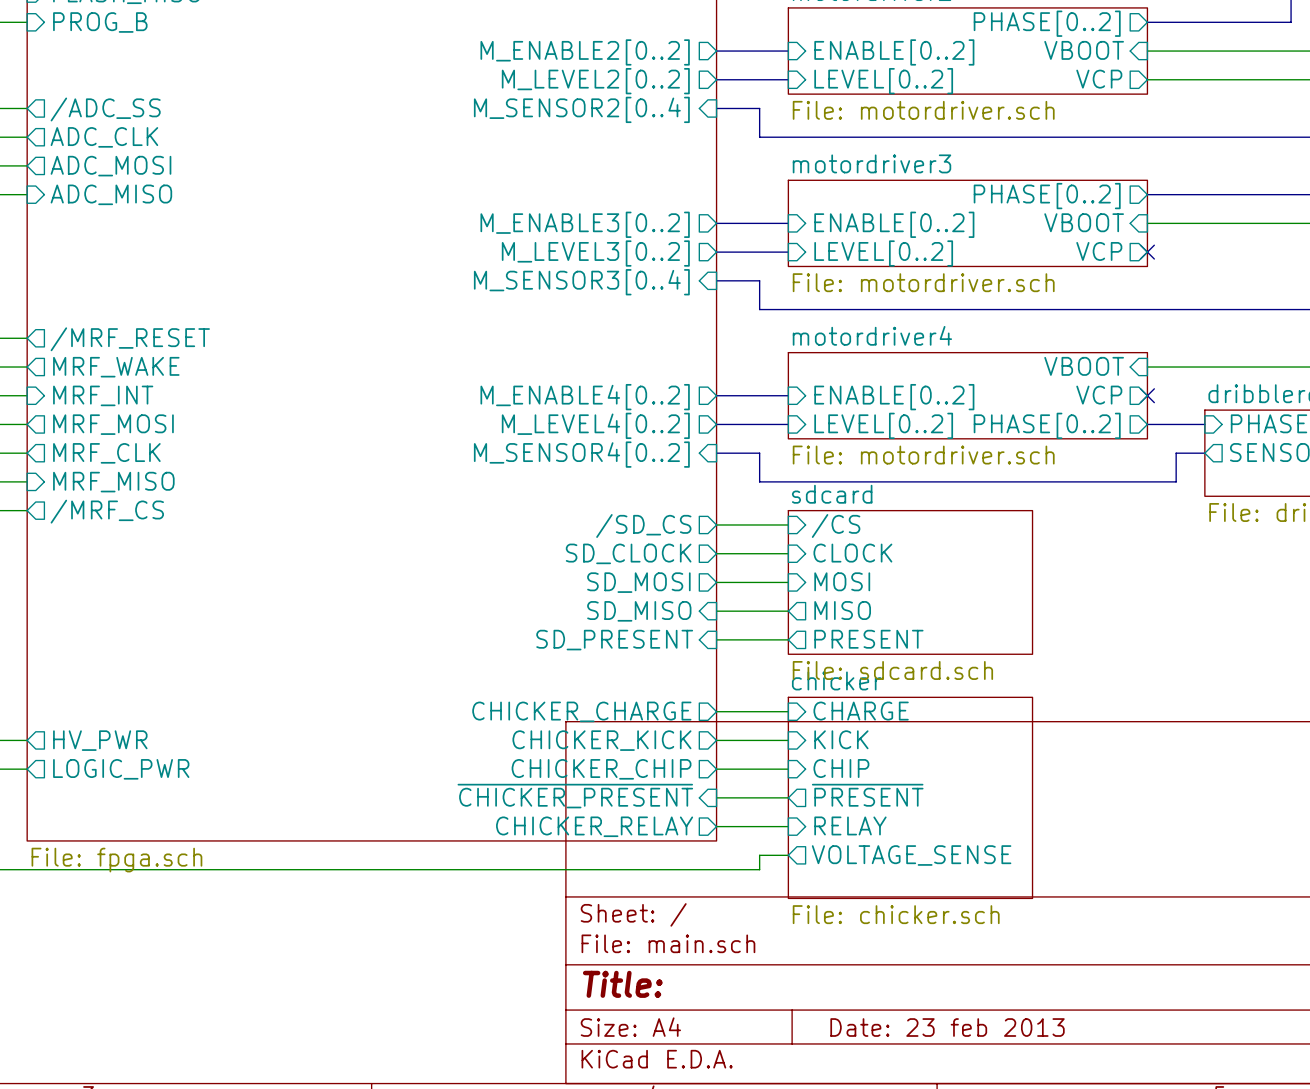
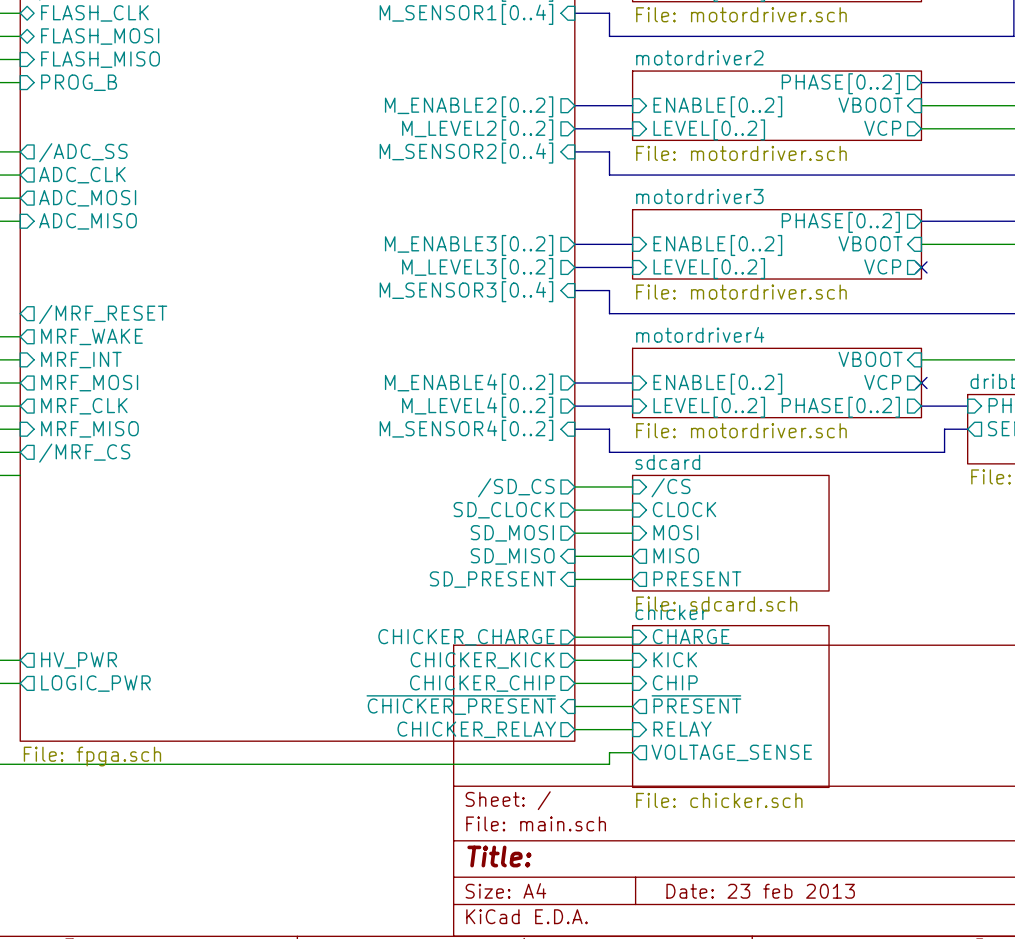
sheet pin: none -> /MRF_RESET (103, 314)
sheet pin: /MRF_RESET (130, 339) -> MRF_WAKE (91, 336)
sheet pin shape: output (116, 367) -> input (81, 360)
sheet pin: MRF_WAKE (116, 367) -> MRF_INT (81, 360)
sheet pin shape: input (103, 395) -> output (89, 383)
sheet pin: MRF_INT (103, 395) -> MRF_MOSI (89, 383)
sheet pin: MRF_MOSI (113, 424) -> MRF_CLK (84, 406)
sheet pin shape: output (106, 453) -> input (89, 429)
sheet pin: MRF_CLK (106, 453) -> MRF_MISO (89, 429)
sheet pin shape: input (113, 482) -> output (84, 453)
sheet pin: MRF_MISO (113, 482) -> /MRF_CS (84, 453)
sheet pin: /MRF_CS (107, 511) -> none

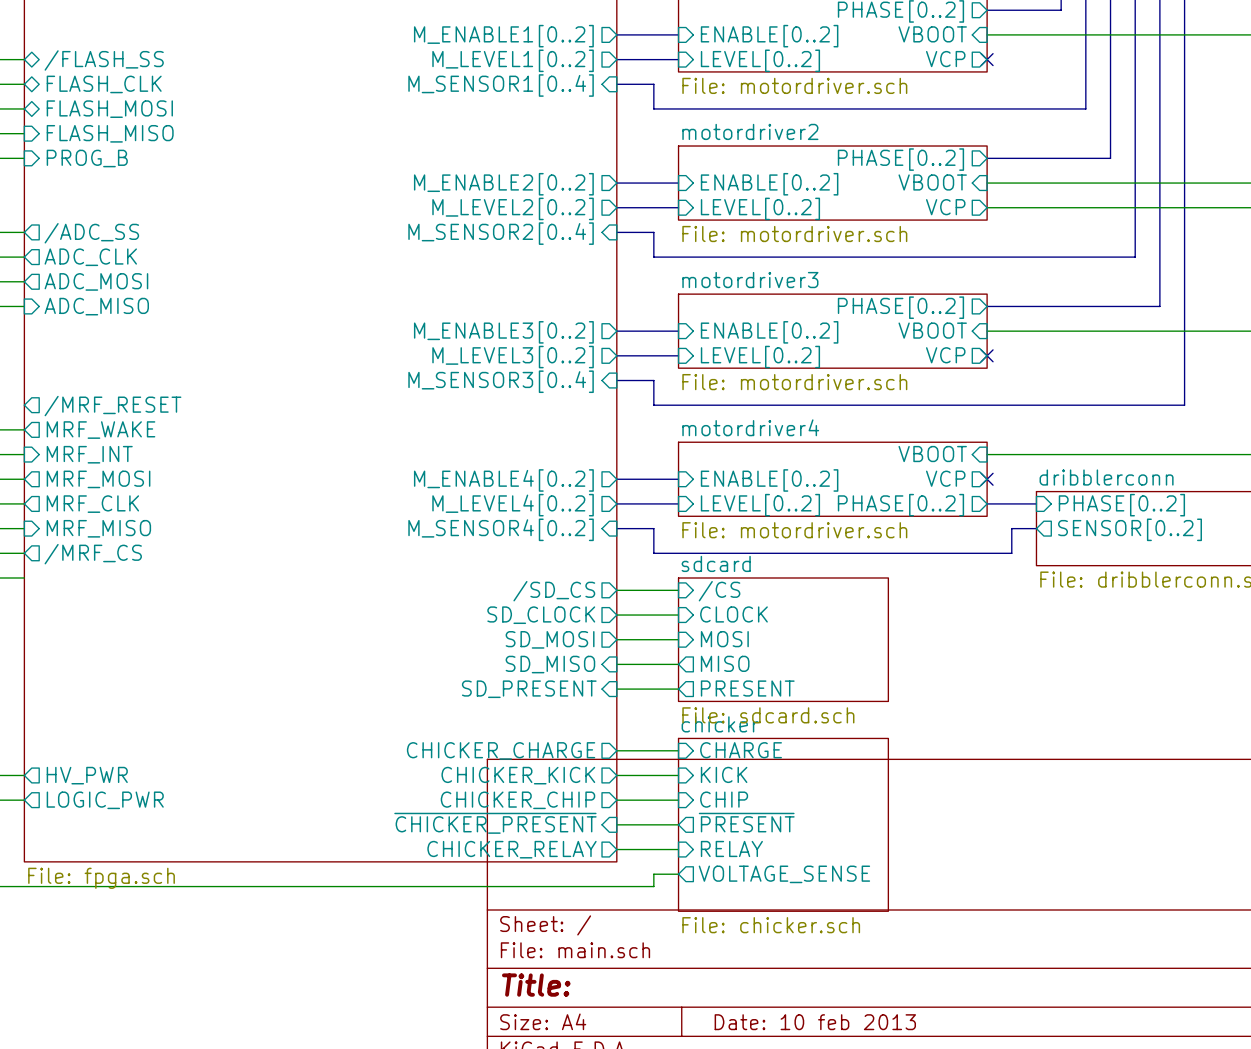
title block: Date: 23 feb 2013 (760, 891) -> Date: 10 feb 2013 (815, 1022)

